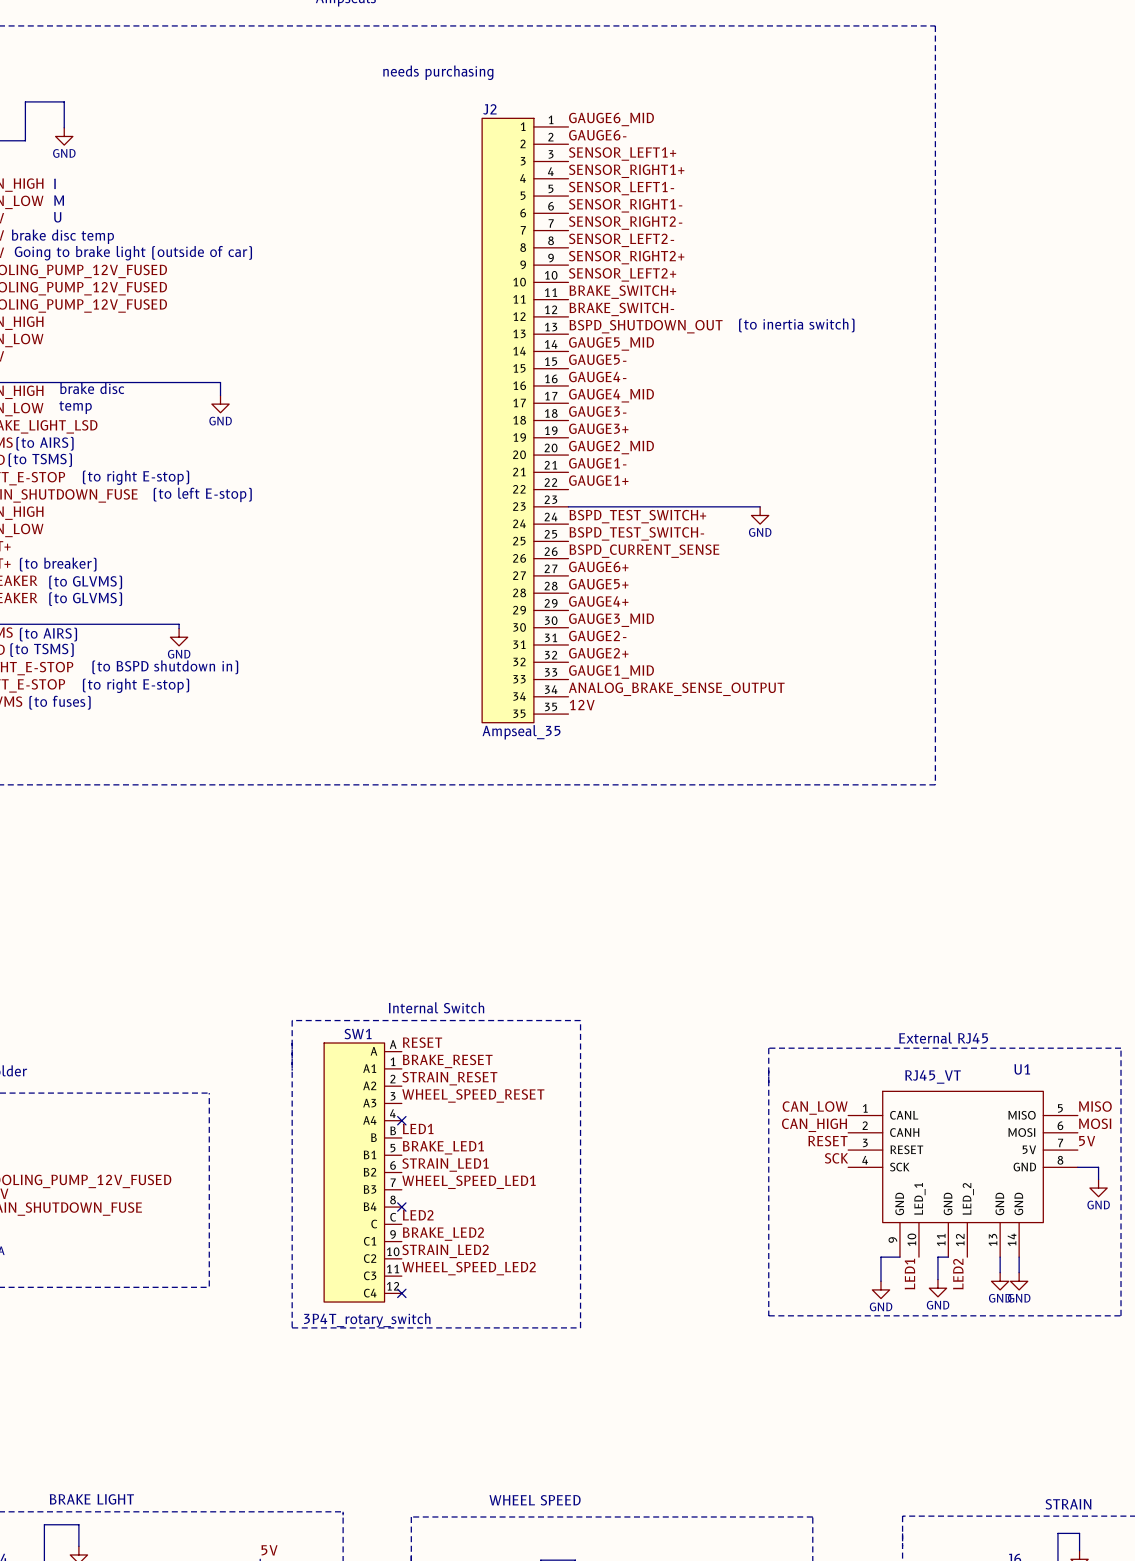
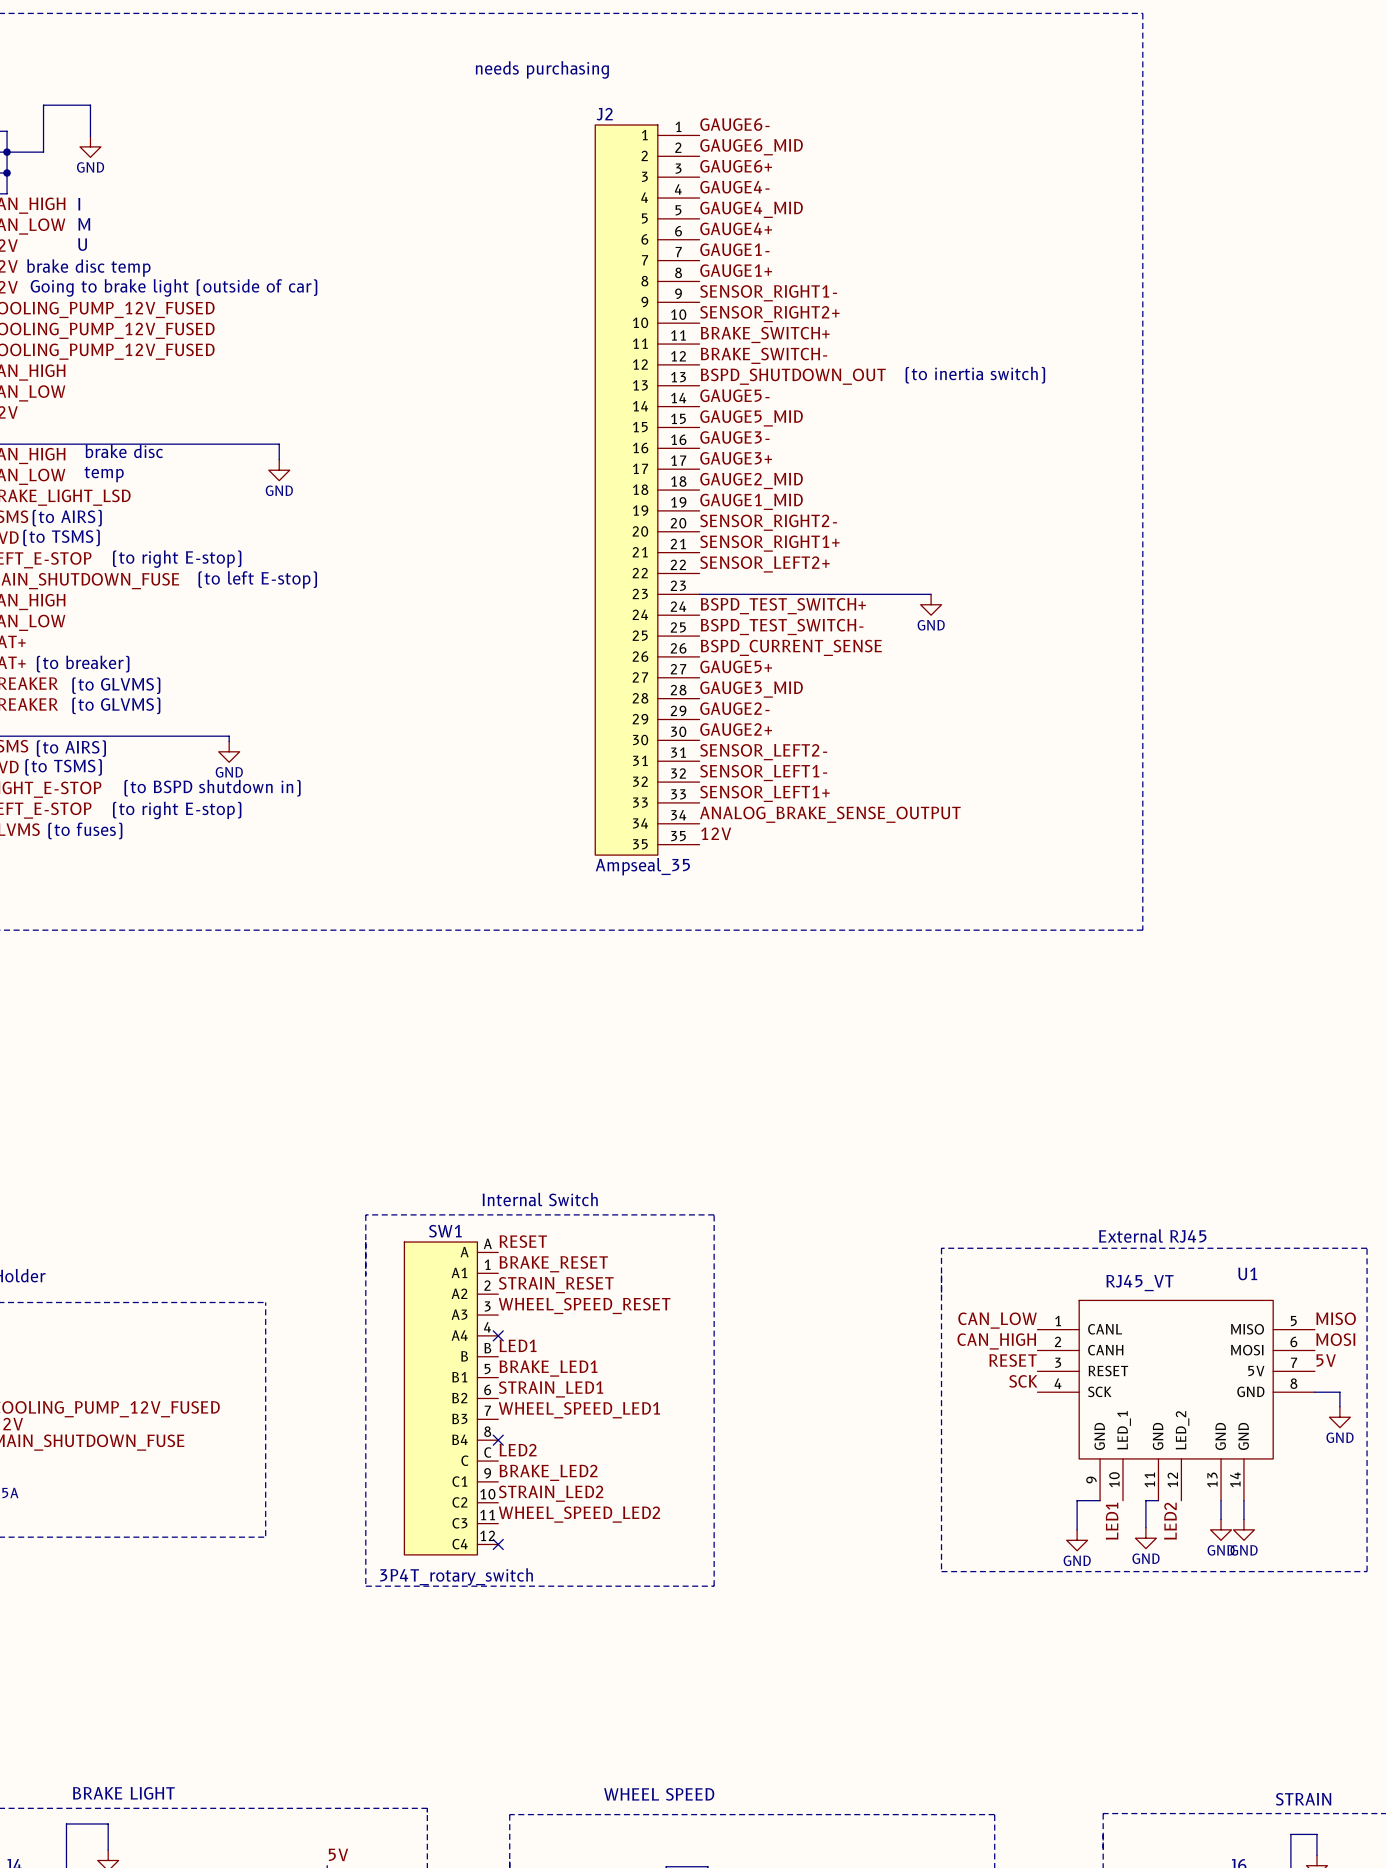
label: GAUGE6_MID (611, 119) -> GAUGE6- (734, 124)
label: GAUGE6- (597, 135) -> GAUGE6_MID (751, 147)
label: SENSOR_LEFT1+ (622, 154) -> GAUGE6+ (736, 166)
label: SENSOR_RIGHT1+ (626, 171) -> GAUGE4- (734, 187)
label: SENSOR_LEFT1- (621, 188) -> GAUGE4_MID (751, 209)
label: SENSOR_RIGHT1- (625, 205) -> GAUGE4+ (736, 228)
label: SENSOR_RIGHT2- (625, 223) -> GAUGE1- (734, 249)
label: SENSOR_LEFT2- (621, 240) -> GAUGE1+ (736, 270)
label: SENSOR_RIGHT2+ (626, 257) -> SENSOR_RIGHT1- (768, 293)
label: SENSOR_LEFT2+ (622, 274) -> SENSOR_RIGHT2+ (769, 314)
label: GAUGE5_MID (611, 343) -> GAUGE5- (734, 395)
label: GAUGE5- (597, 359) -> GAUGE5_MID (751, 418)
label: GAUGE4- (597, 377) -> GAUGE3- (734, 437)
label: GAUGE4_MID (611, 395) -> GAUGE3+ (736, 458)
label: GAUGE3- (597, 411) -> GAUGE2_MID (751, 481)
label: GAUGE3+ (598, 428) -> GAUGE1_MID (751, 501)
label: GAUGE2_MID (611, 447) -> SENSOR_RIGHT2- (768, 522)
label: GAUGE1- (597, 463) -> SENSOR_RIGHT1+ (769, 543)
label: GAUGE1+ (598, 480) -> SENSOR_LEFT2+ (764, 564)
label: GAUGE6+ (598, 566) -> GAUGE5+ (736, 666)
label: GAUGE5+ (598, 584) -> GAUGE3_MID (751, 689)
label: GAUGE4+ (598, 601) -> GAUGE2- (734, 708)
label: GAUGE3_MID (611, 620) -> GAUGE2+ (736, 729)
label: GAUGE2- (597, 636) -> SENSOR_LEFT2- (763, 752)
label: GAUGE2+ (598, 653) -> SENSOR_LEFT1- (763, 773)
label: GAUGE1_MID (611, 672) -> SENSOR_LEFT1+ (764, 793)

